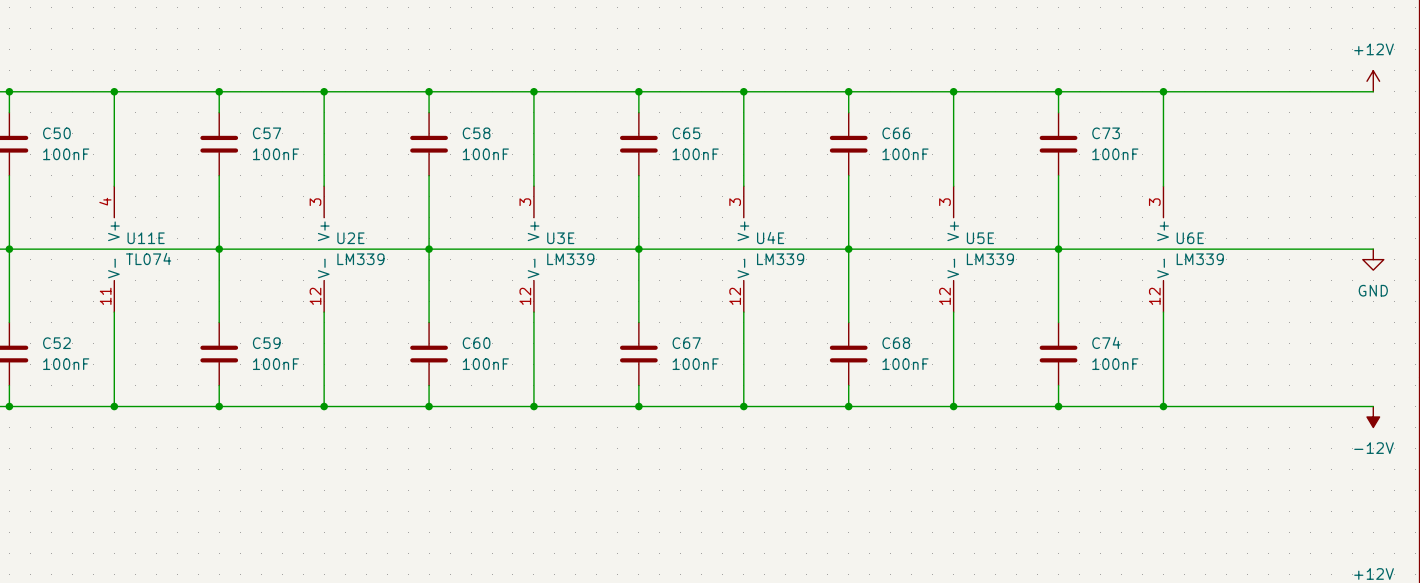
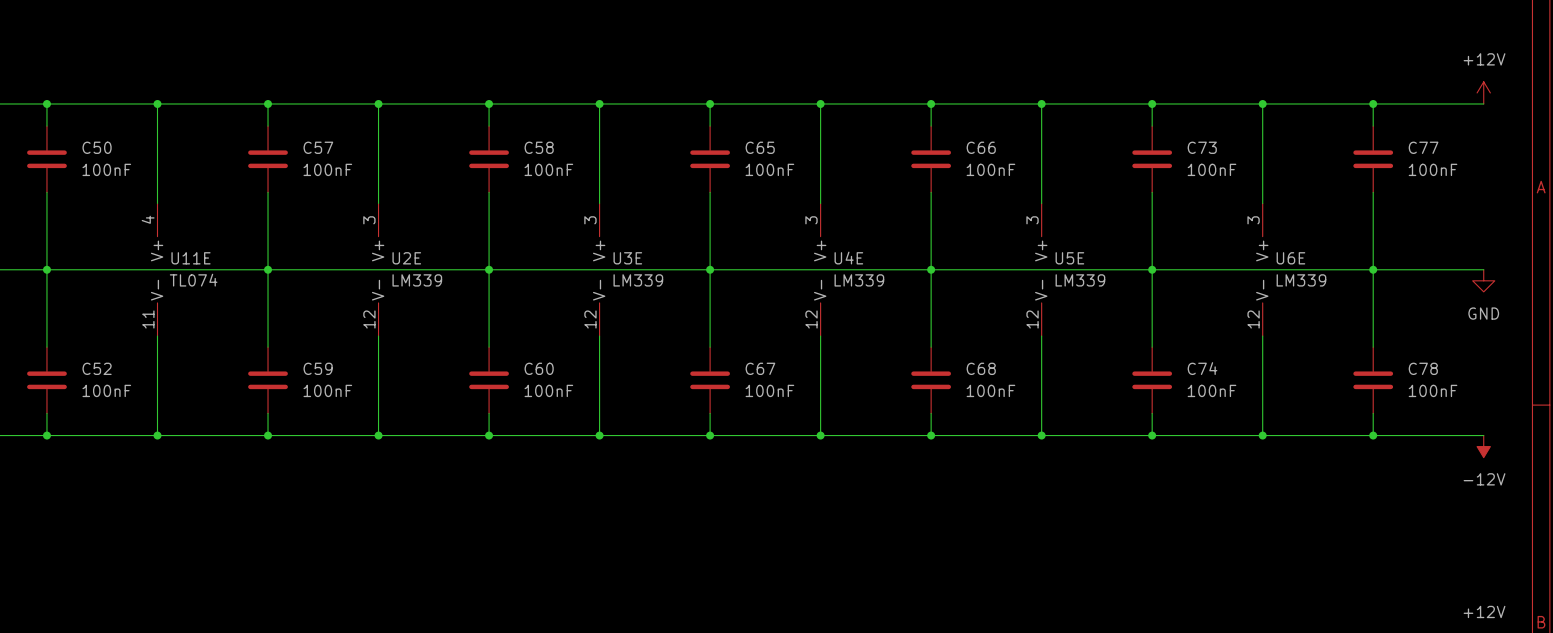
wire: none -> (1373, 103) (1373, 126)
junction: none -> (1373, 103)
C77: none -> 100nF (1373, 159)
wire: none -> (1373, 192) (1373, 347)
junction: none -> (1373, 269)
C78: none -> 100nF (1373, 380)
wire: none -> (1373, 413) (1373, 435)
junction: none -> (1373, 435)

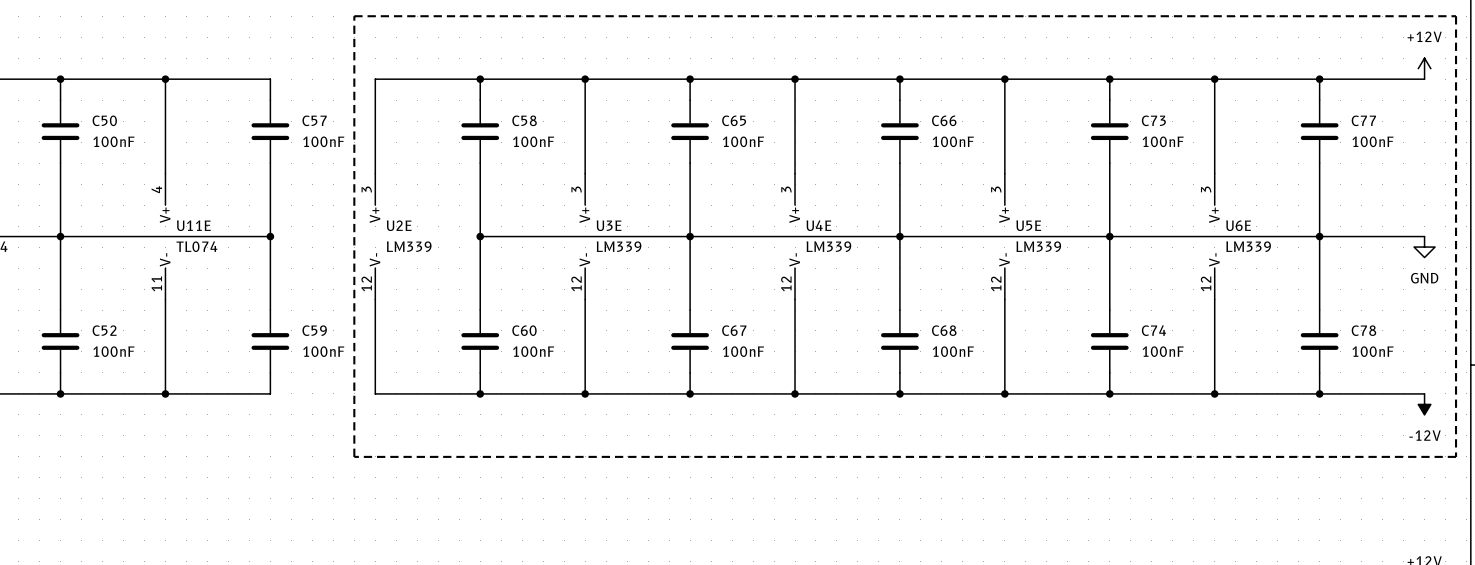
line: none -> (354, 16) (1456, 16) (1456, 456) (354, 456) (354, 16)
wire: (268, 103) (378, 103) -> none
junction: (268, 103) -> none
junction: (378, 103) -> none
wire: (268, 269) (489, 269) -> none
wire: (268, 435) (378, 435) -> none
junction: (268, 435) -> none
junction: (378, 435) -> none

